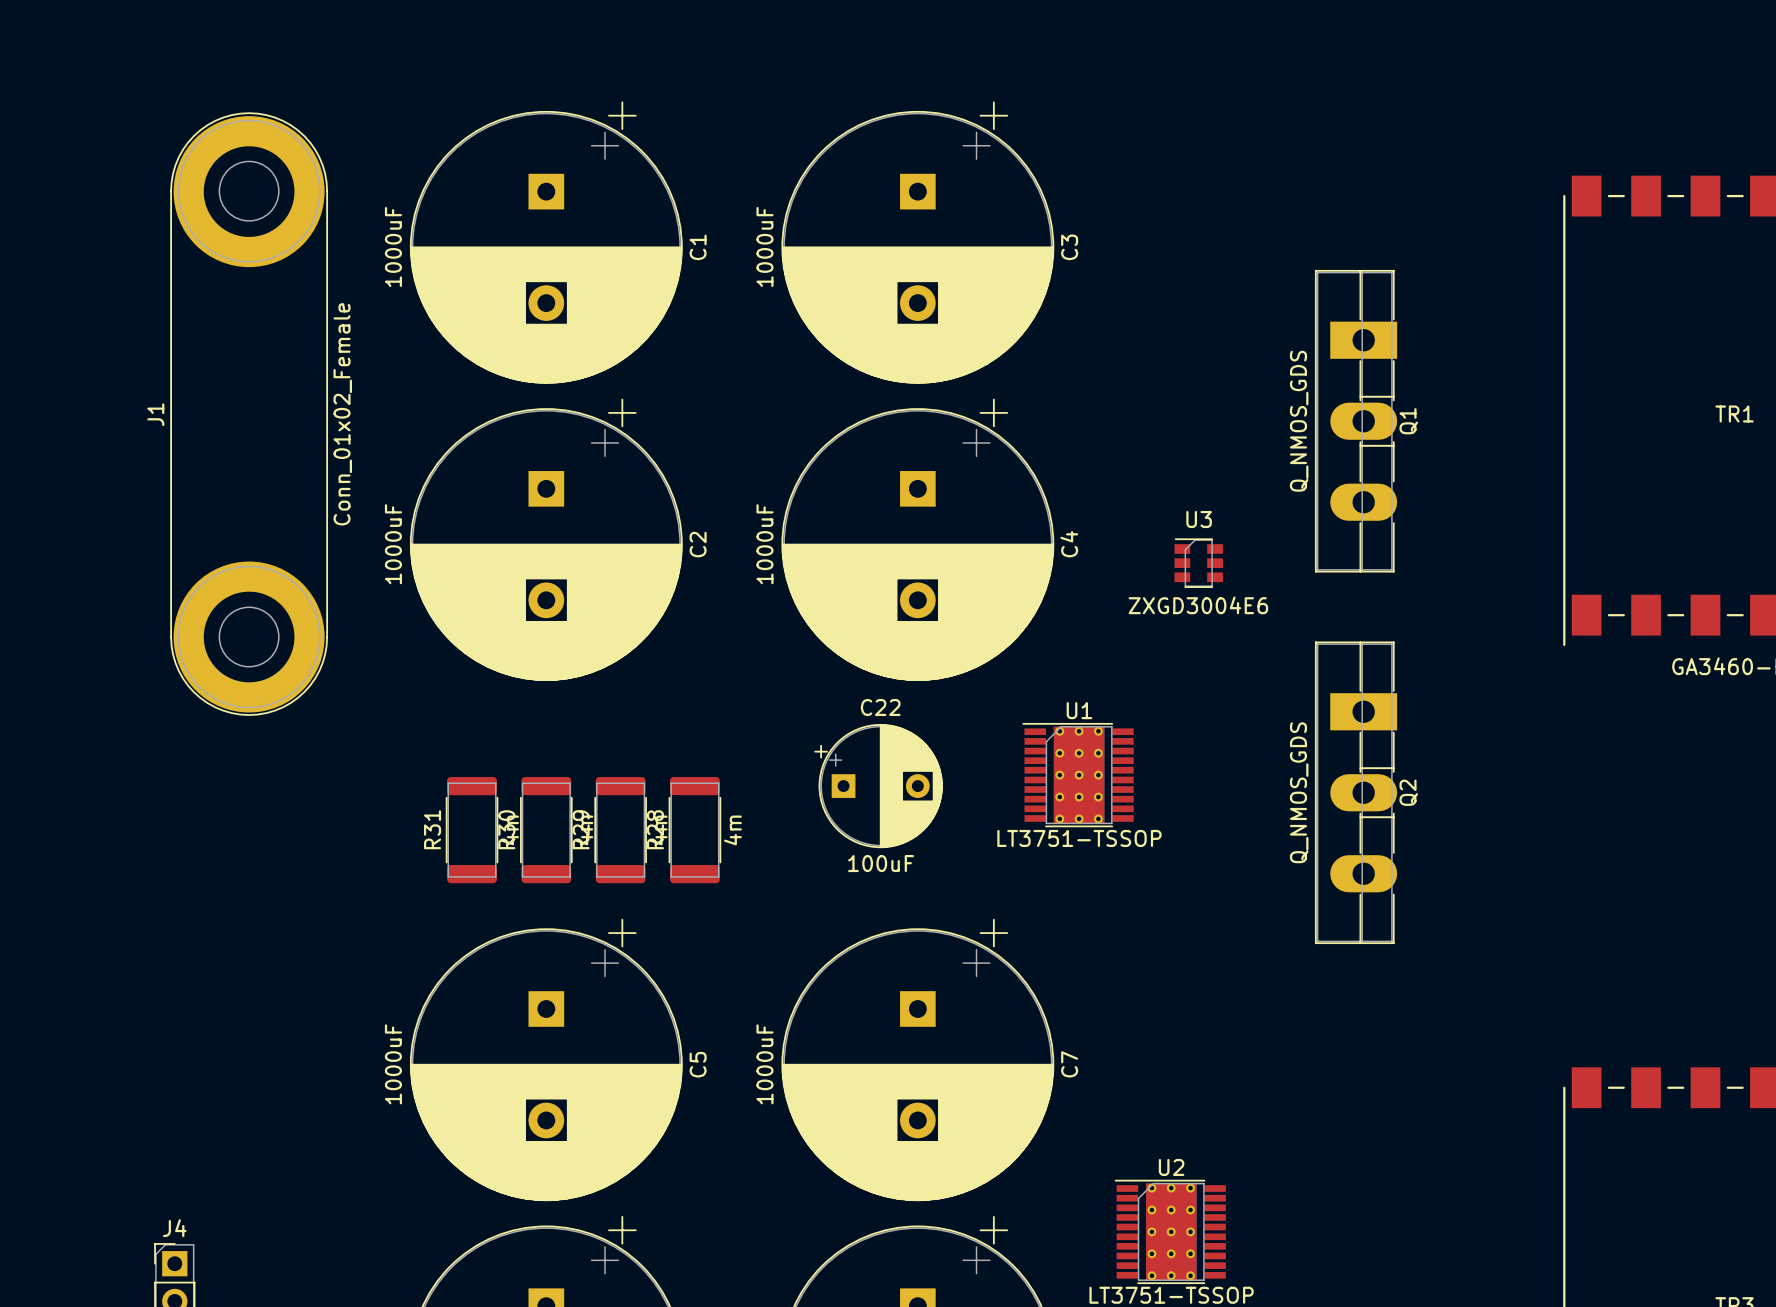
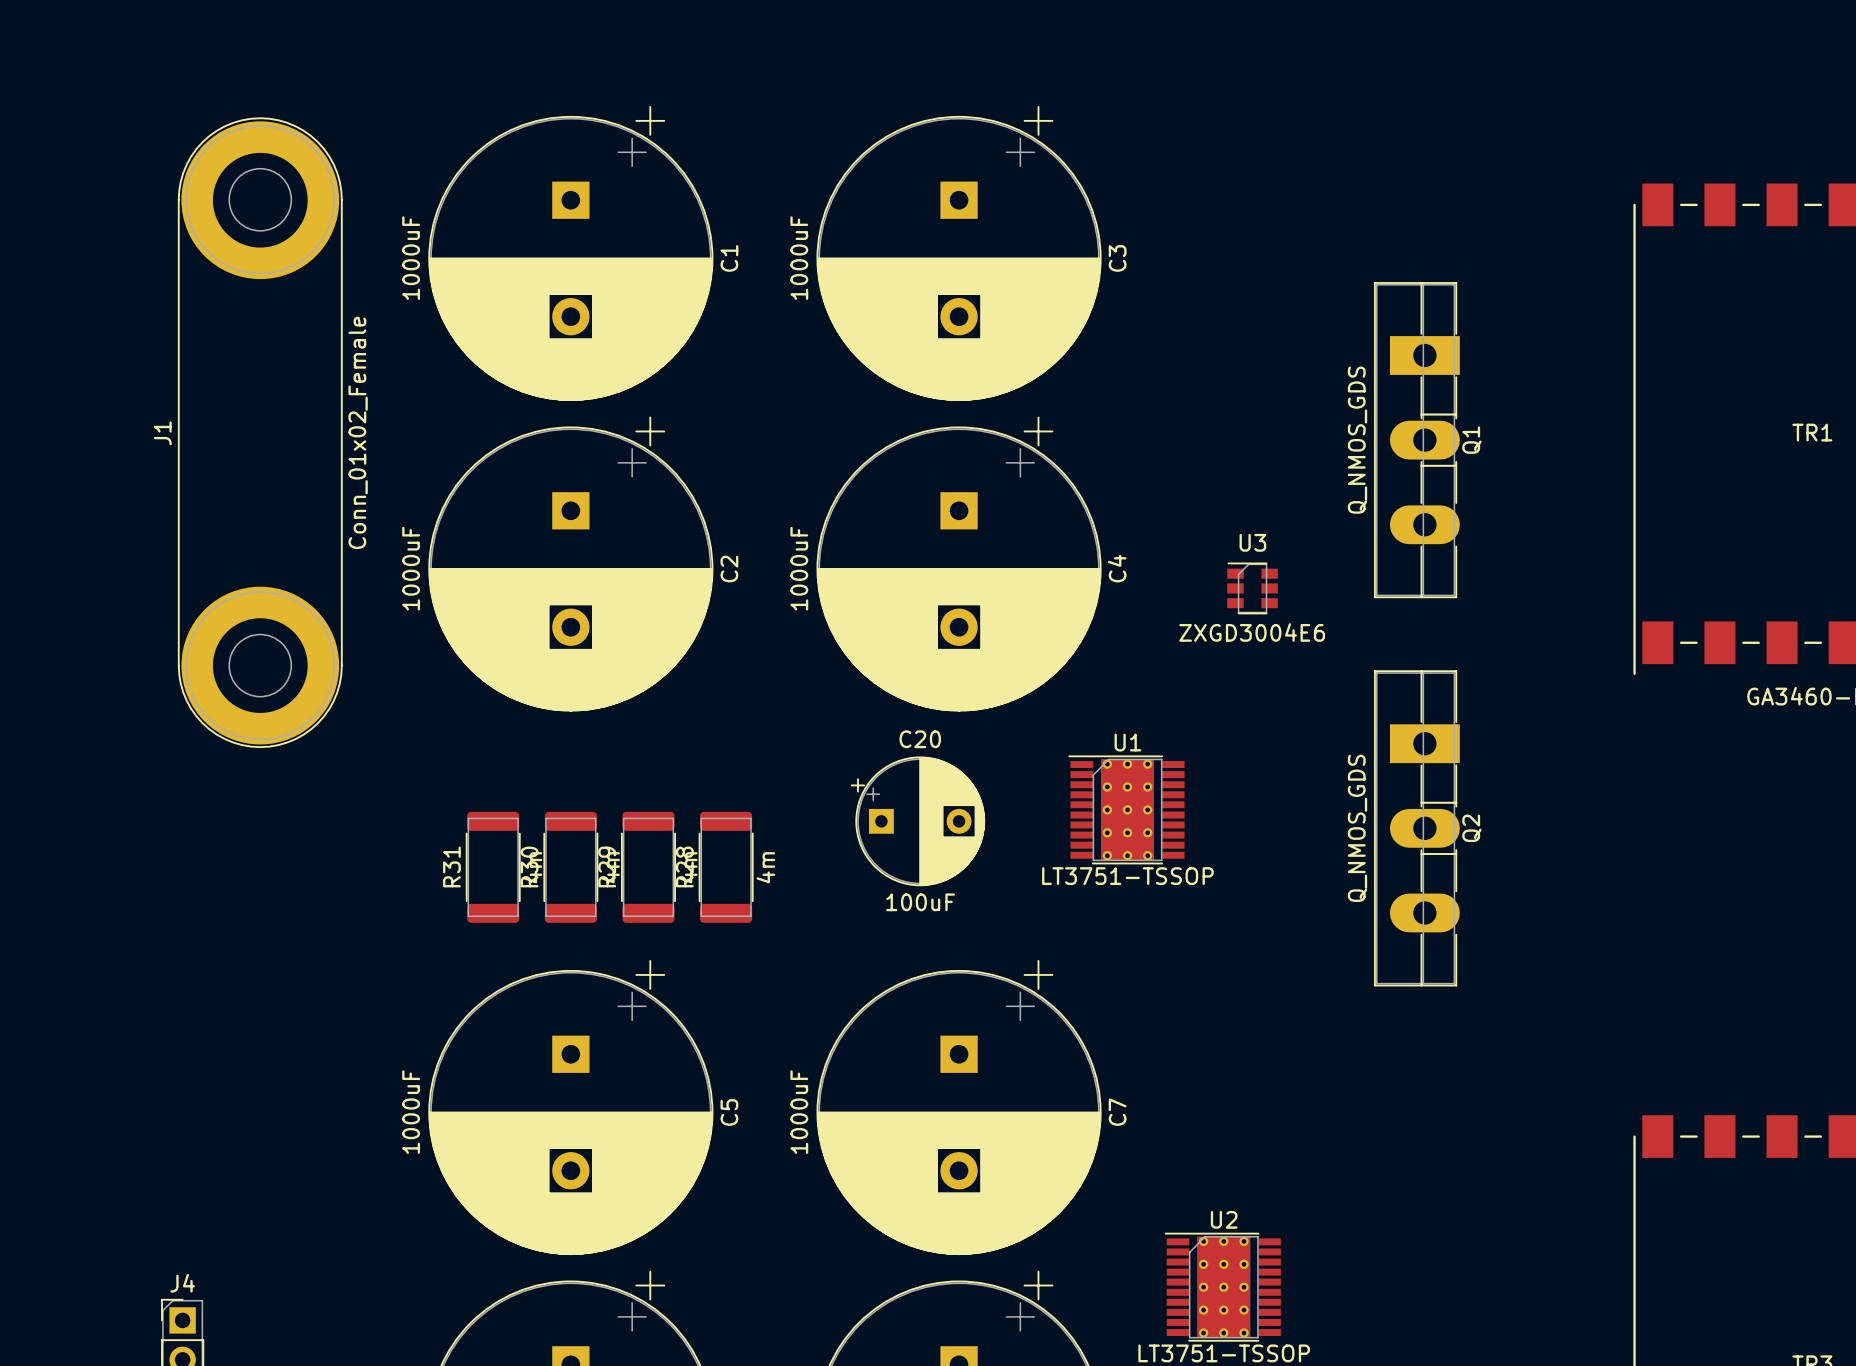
C22 name: C22 (880, 707) -> C20 (920, 739)

